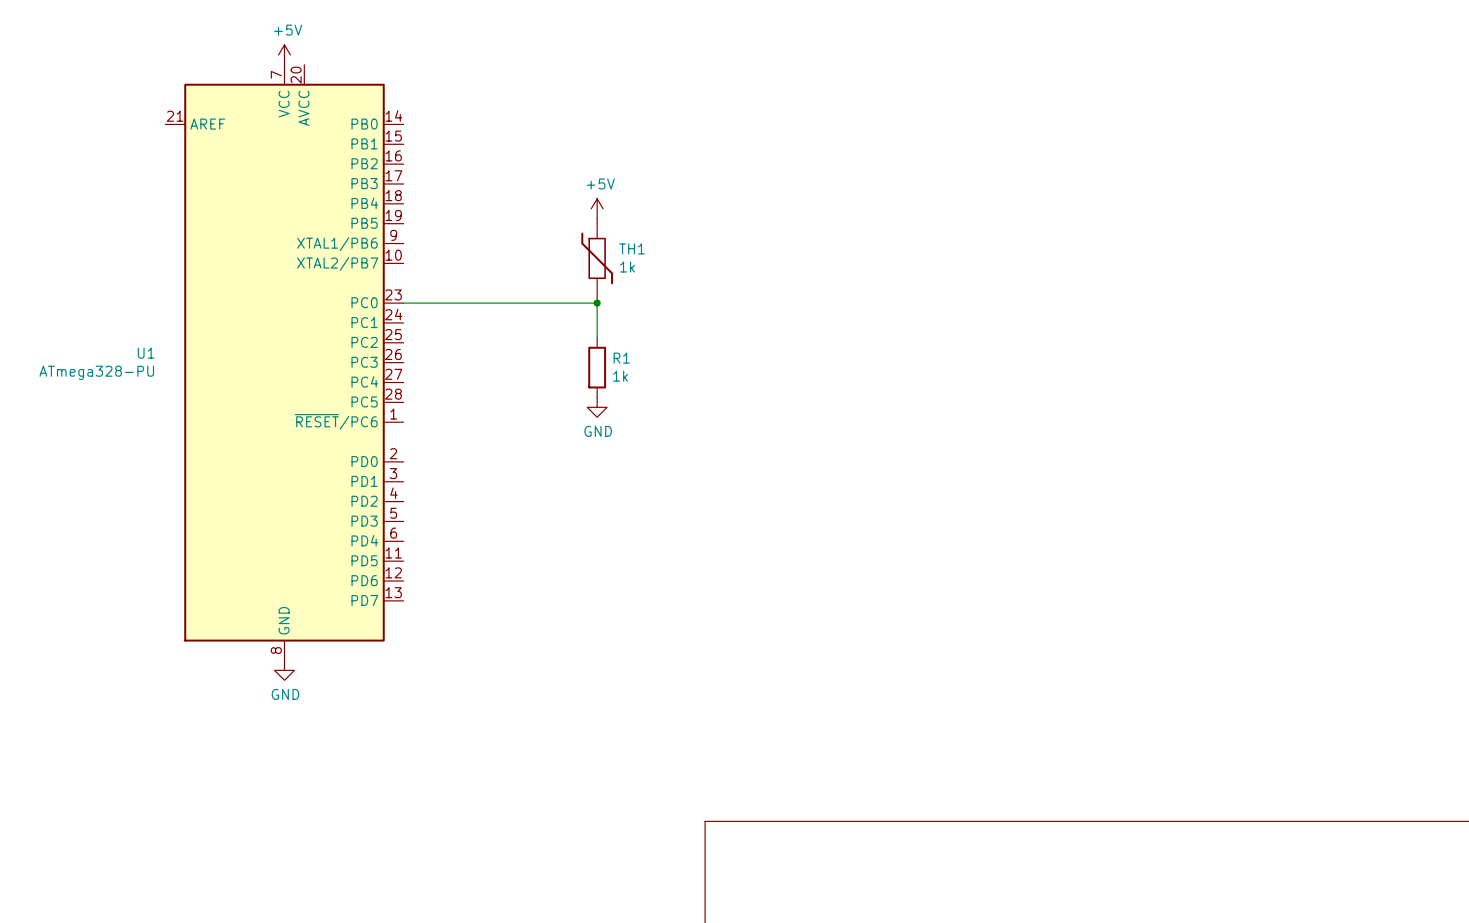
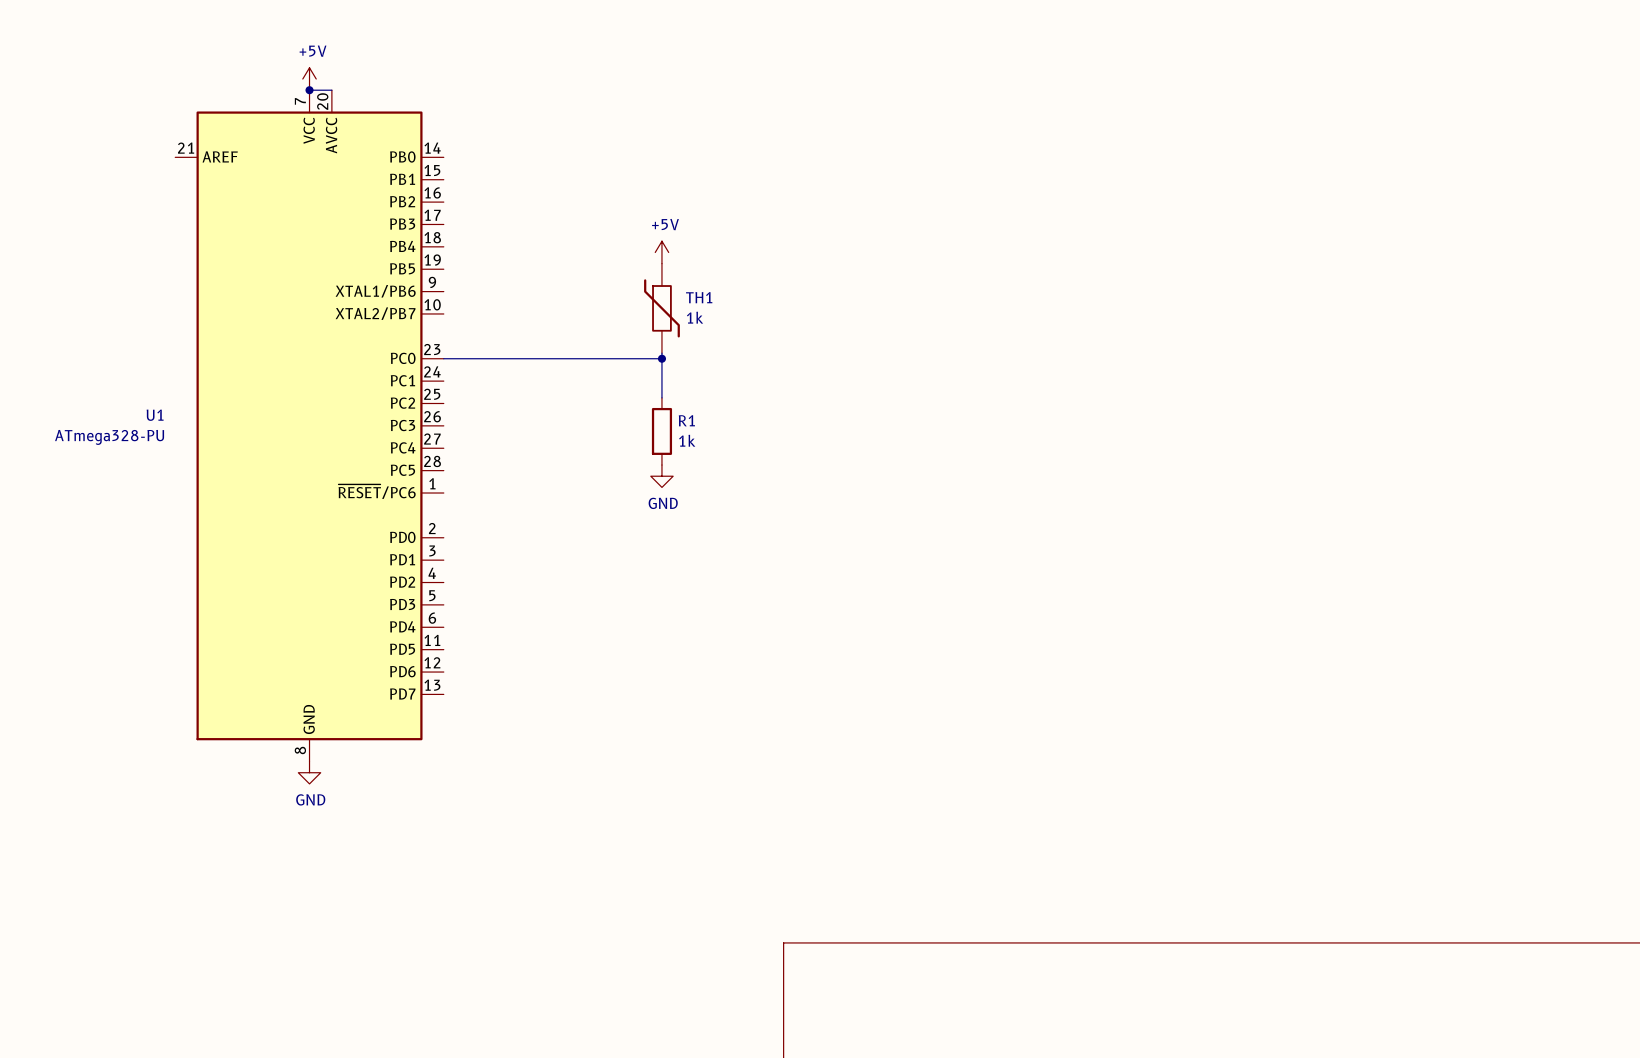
wire: none -> (309, 90) (331, 90)
junction: none -> (309, 90)

